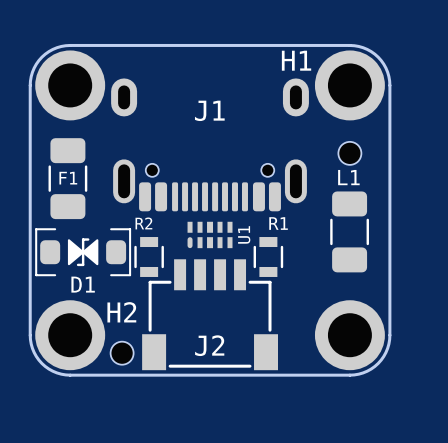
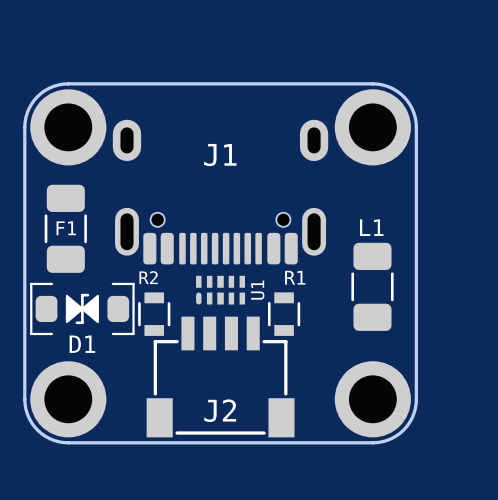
H1: (349, 153) -> none
H2: (122, 353) -> none

